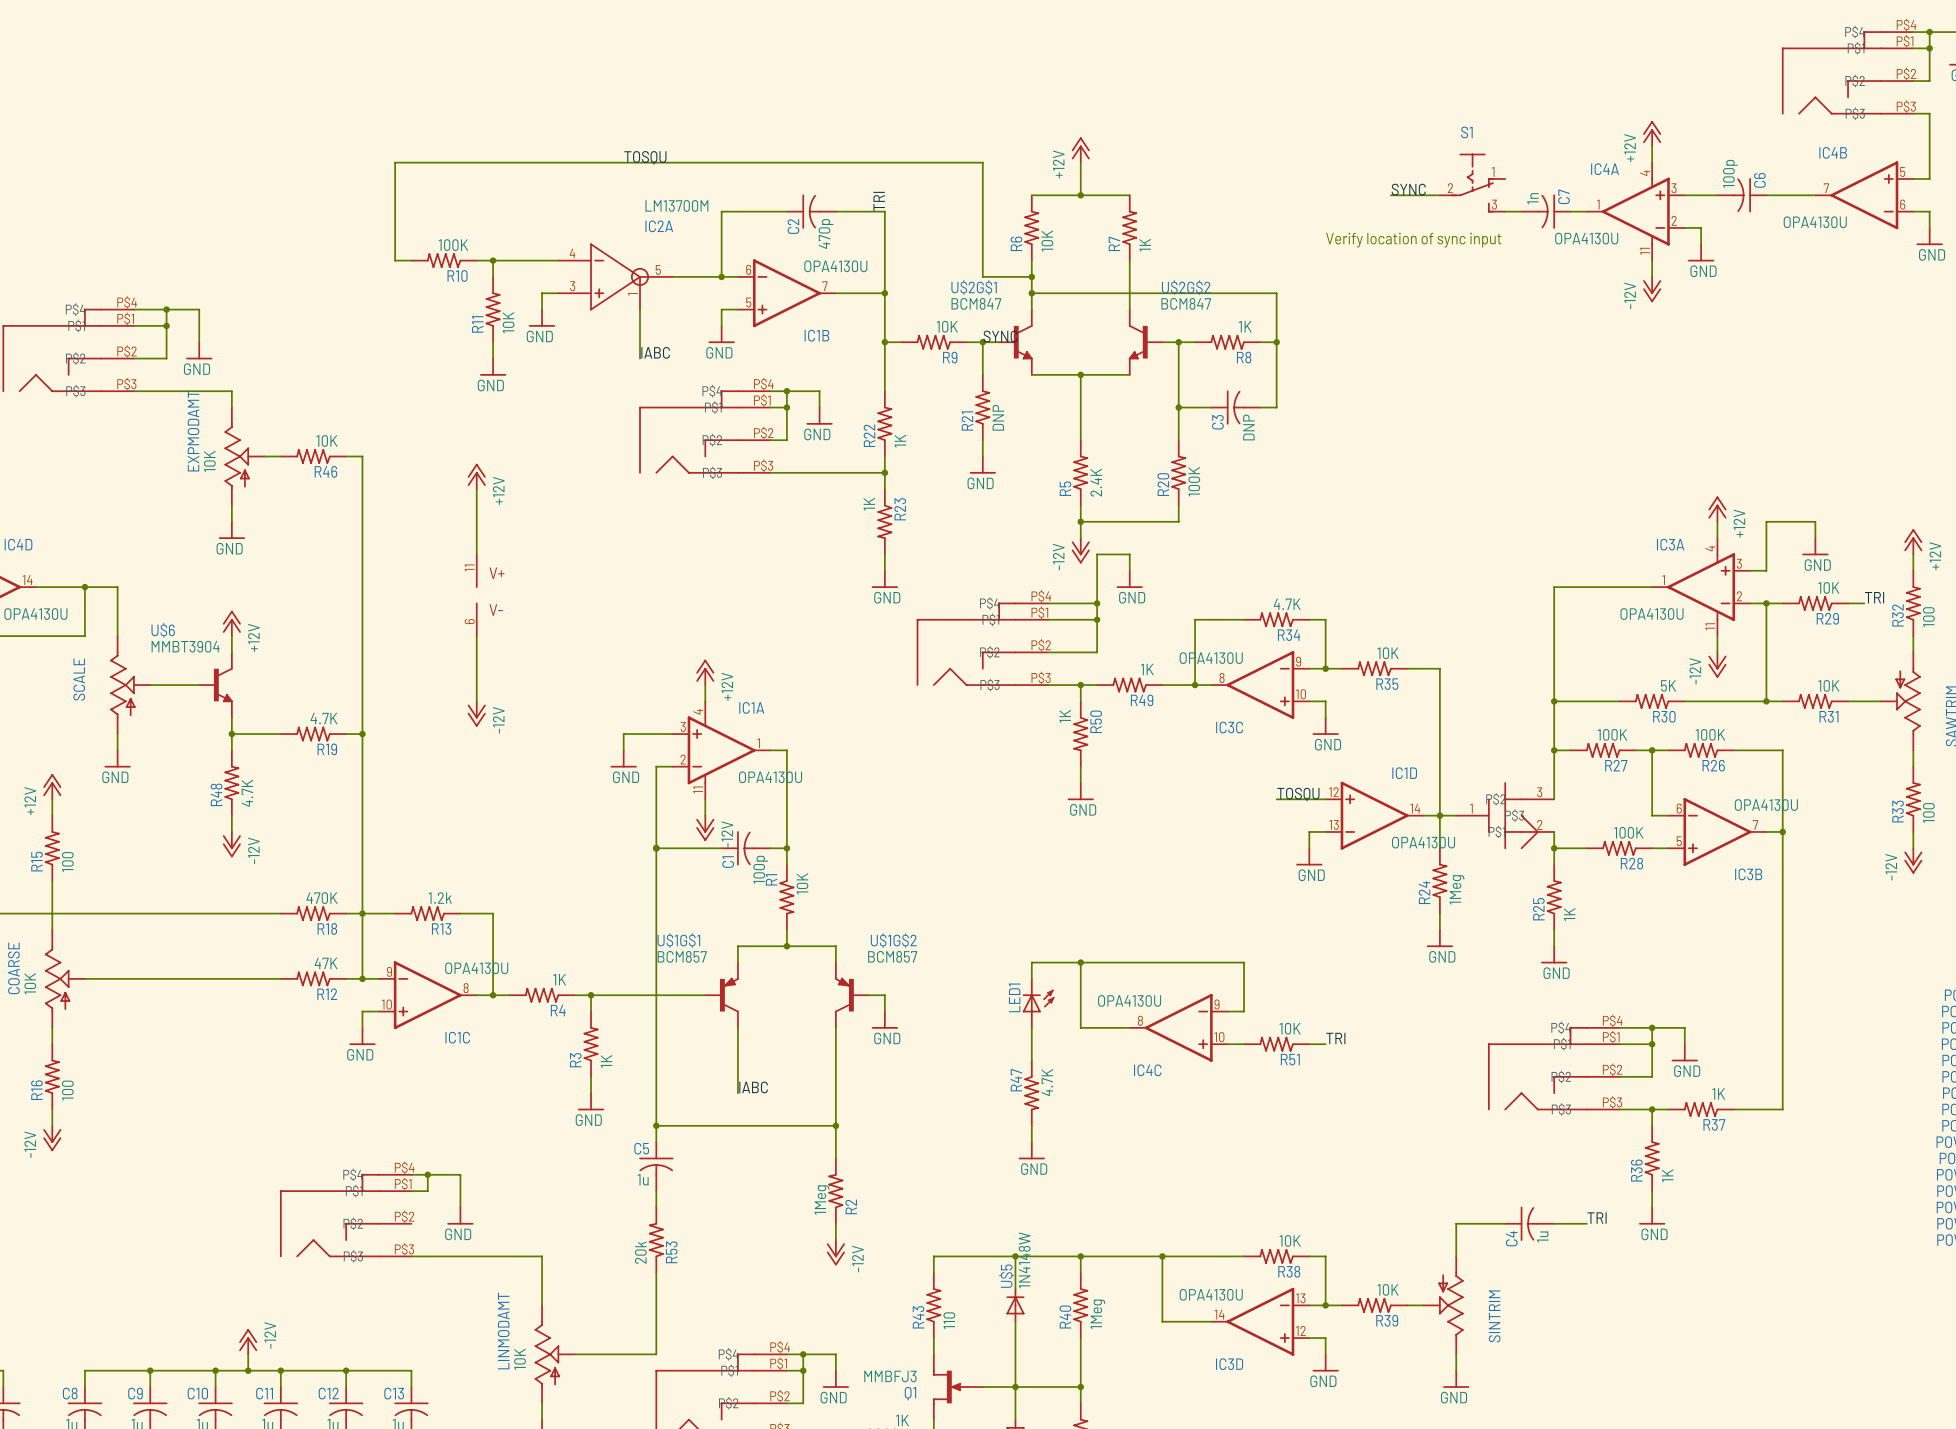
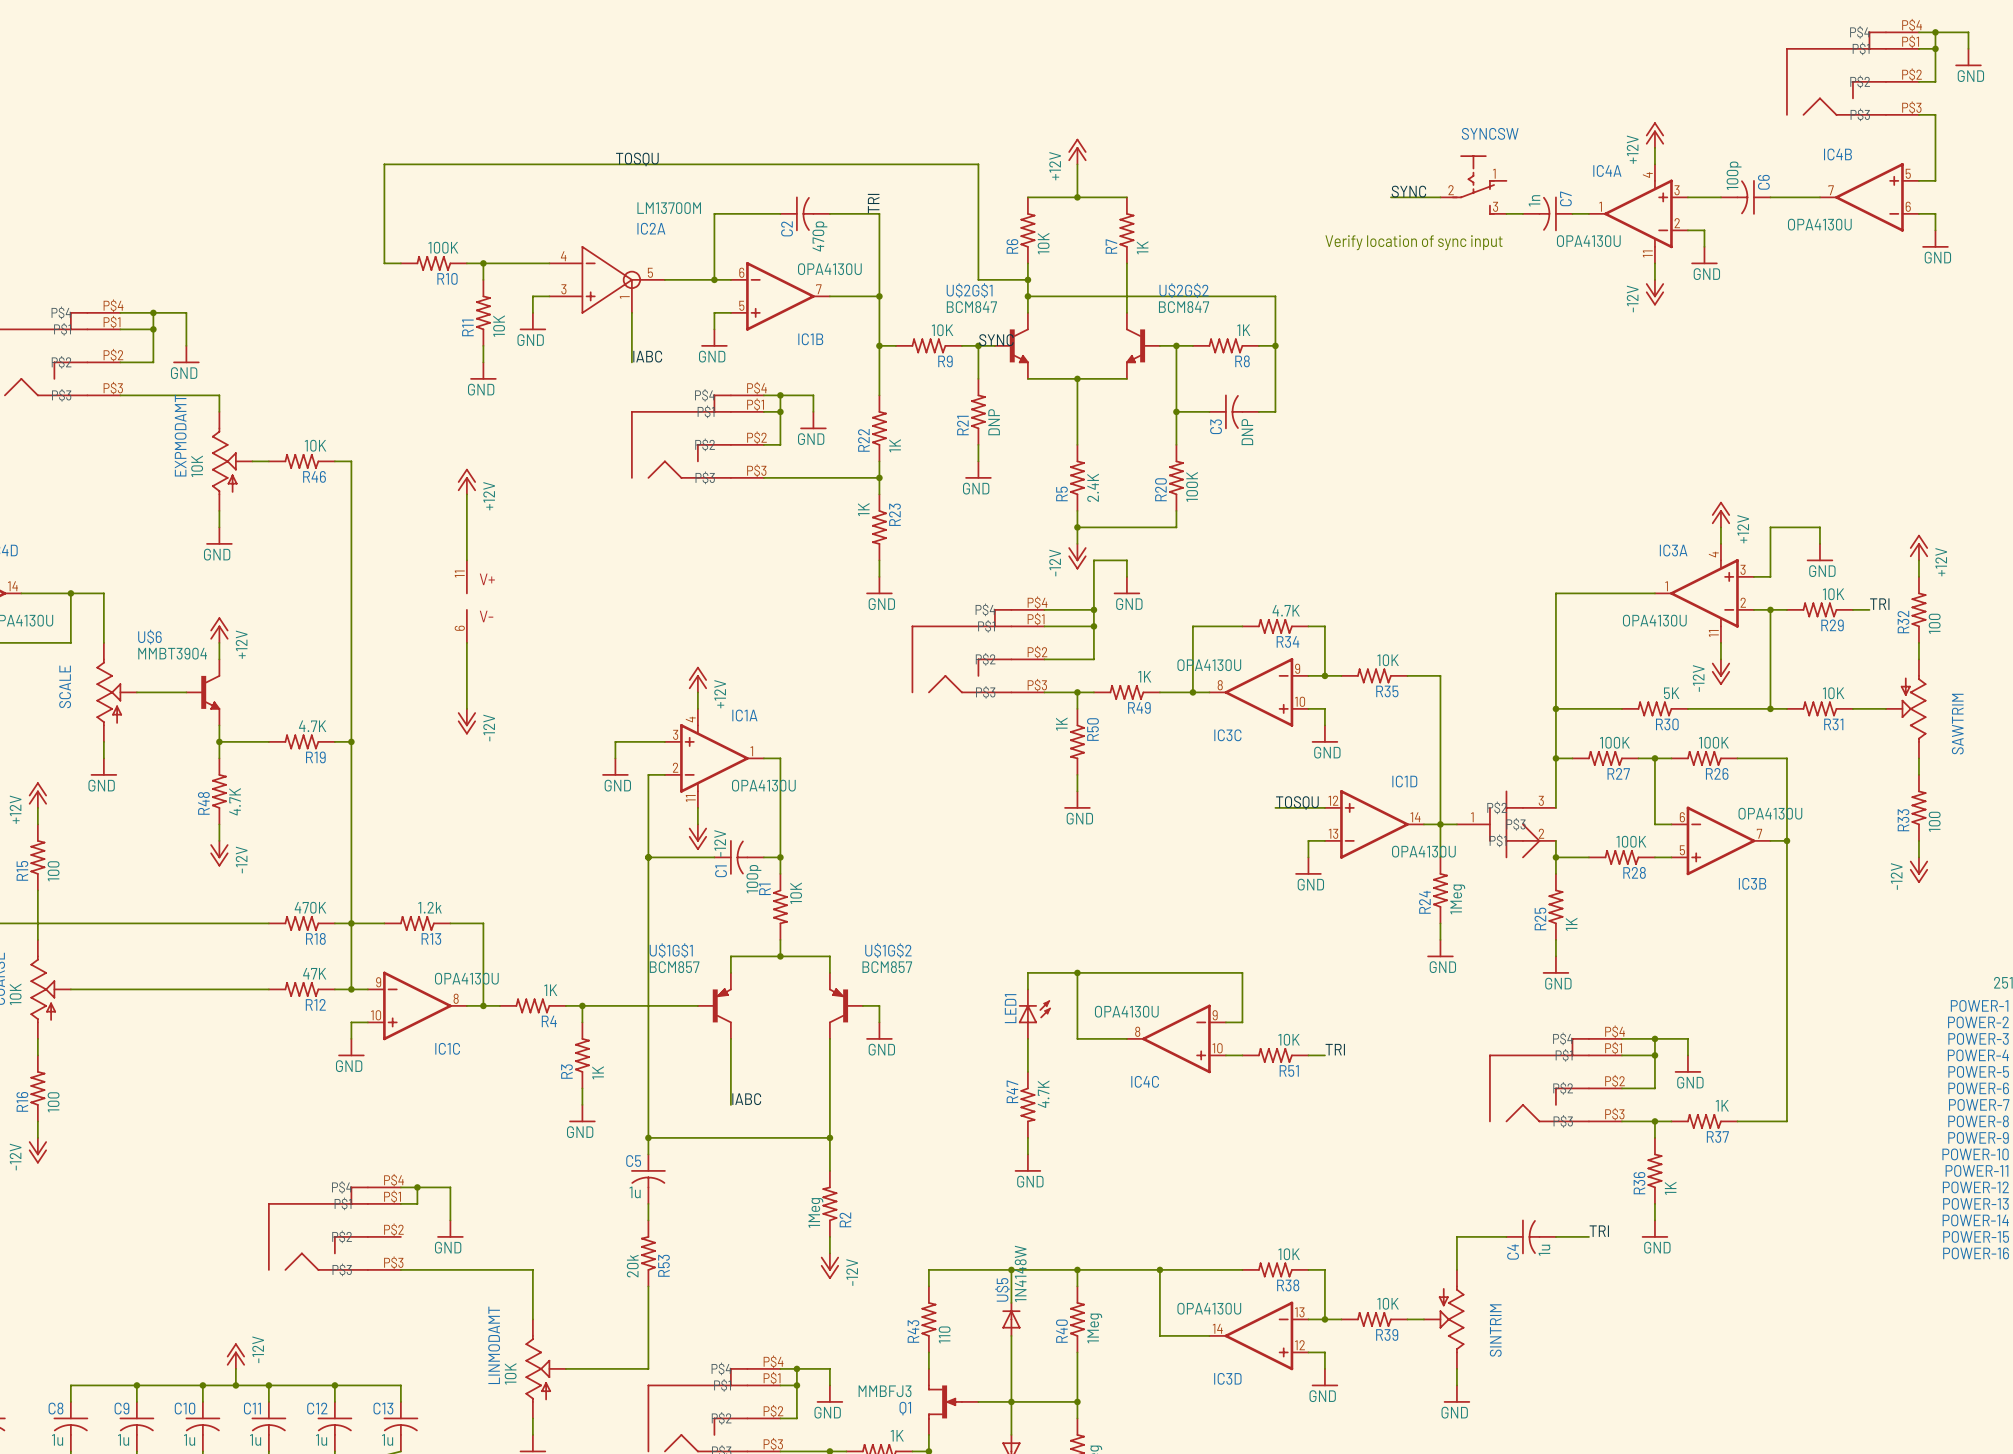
S1 name: S1 (1466, 132) -> SYNCSW (1490, 133)

